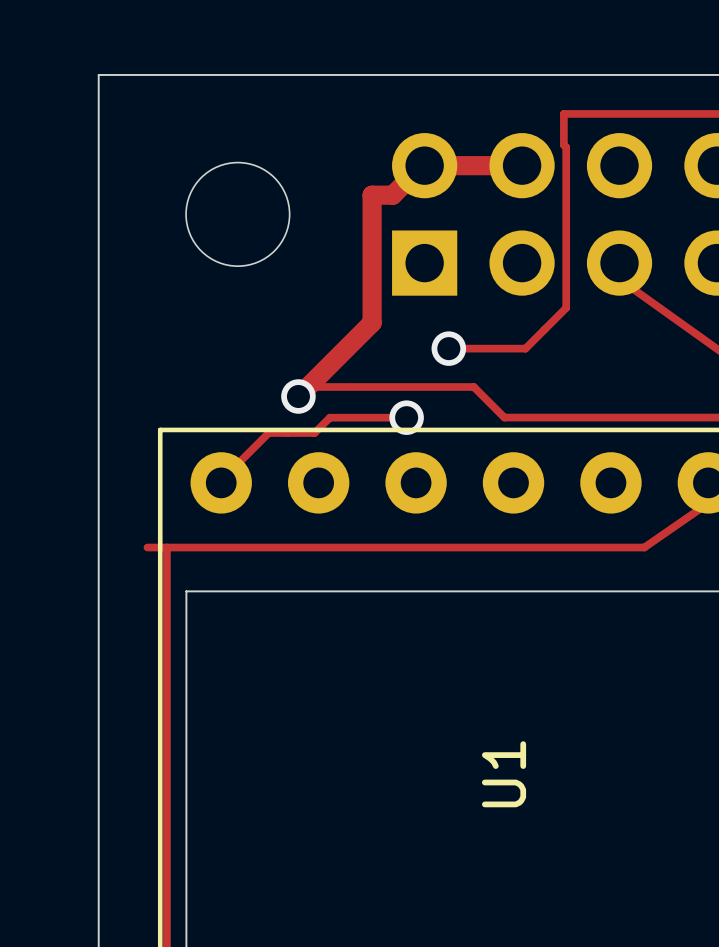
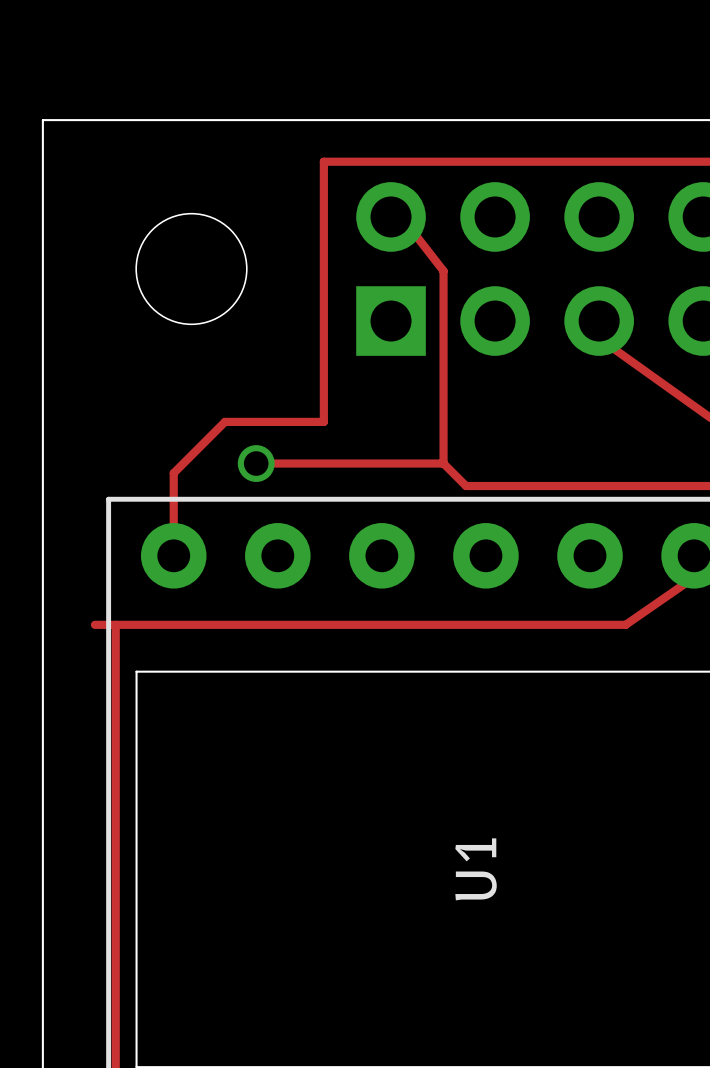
track: (563, 113) (563, 145) (566, 147) (566, 307) (525, 348) (448, 348) -> (539, 161) (323, 161) (323, 421) (225, 421) (173, 473) (173, 553)
track: (522, 165) (422, 165) (392, 195) (372, 195) (372, 322) (298, 396) -> none
track: none -> (407, 224) (443, 271) (443, 463)
via: (448, 348) -> none
track: (303, 386) (473, 386) (504, 417) -> (443, 463) (466, 486) (476, 486)
track: none -> (261, 463) (443, 463)
track: (406, 417) (329, 417) (314, 433) (268, 433) (221, 480) -> none
via: (406, 417) -> none

